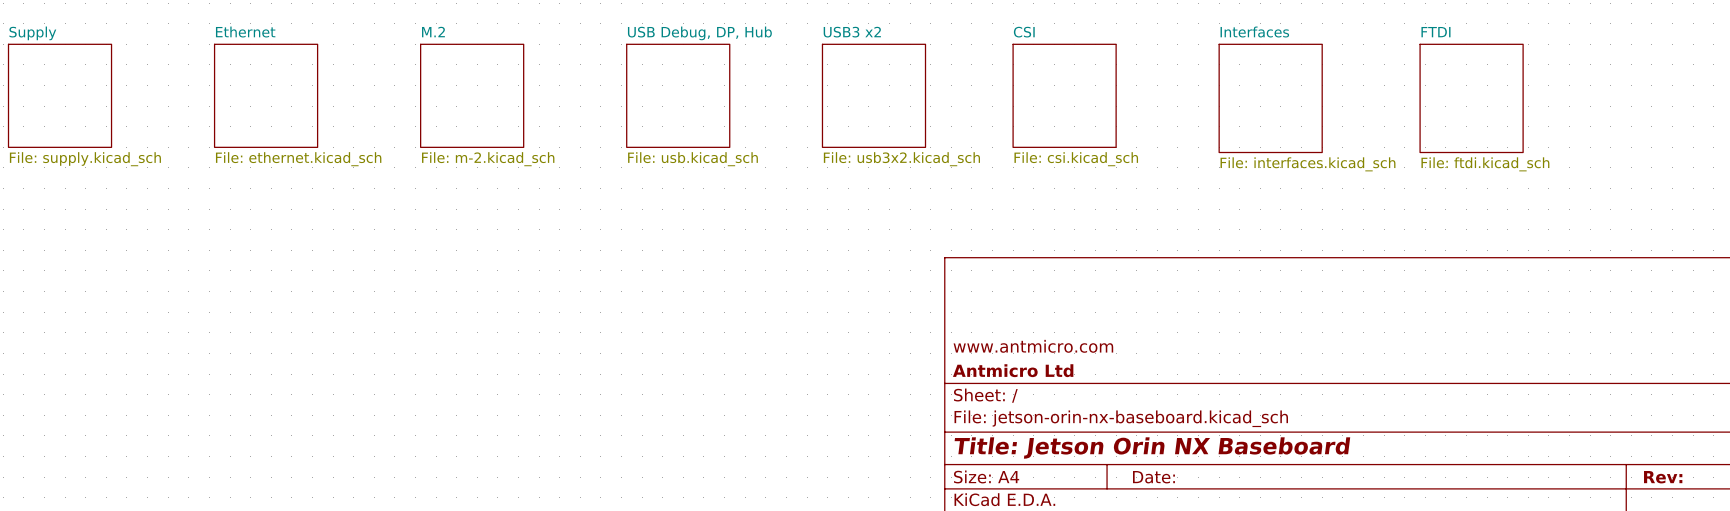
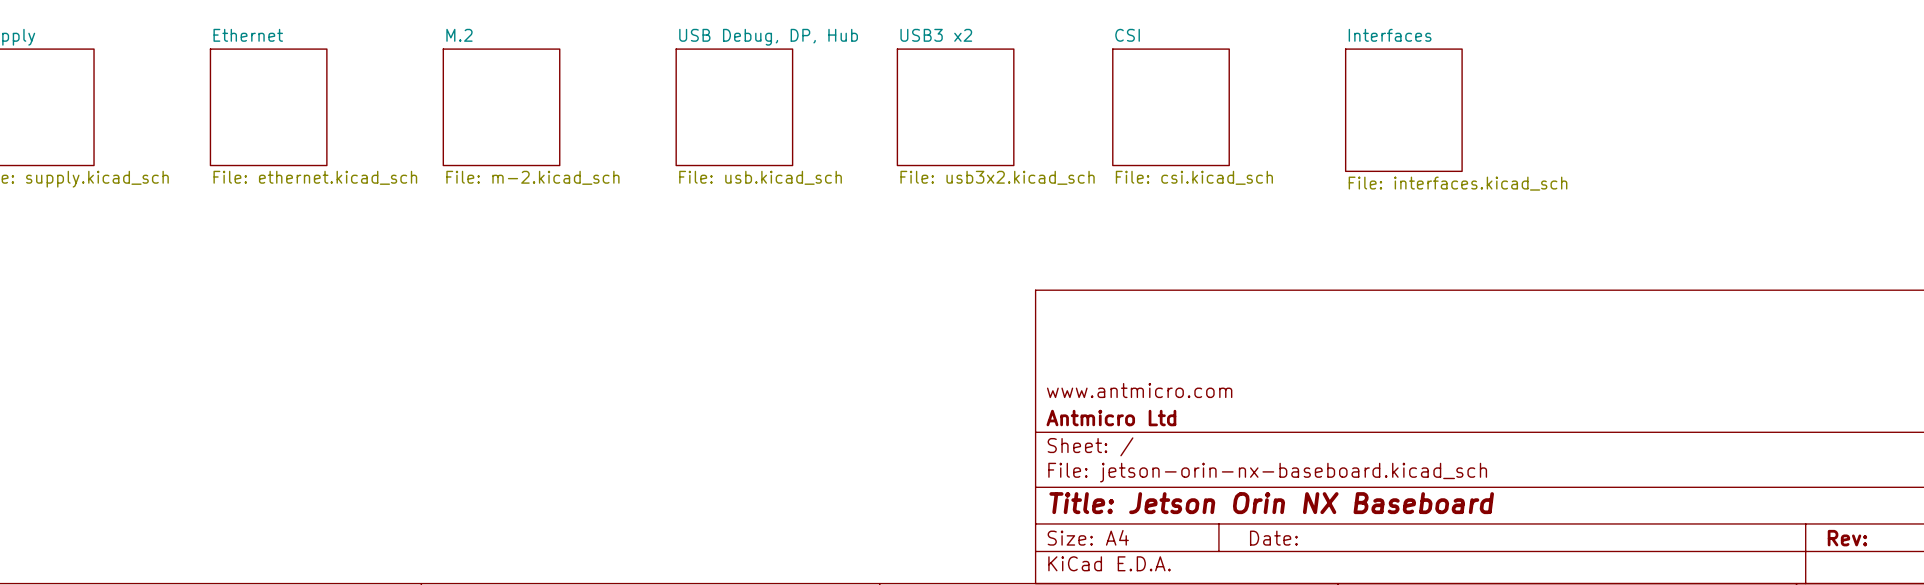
sheet FTDI: File: ftdi.kicad_sch (1471, 98) -> none

